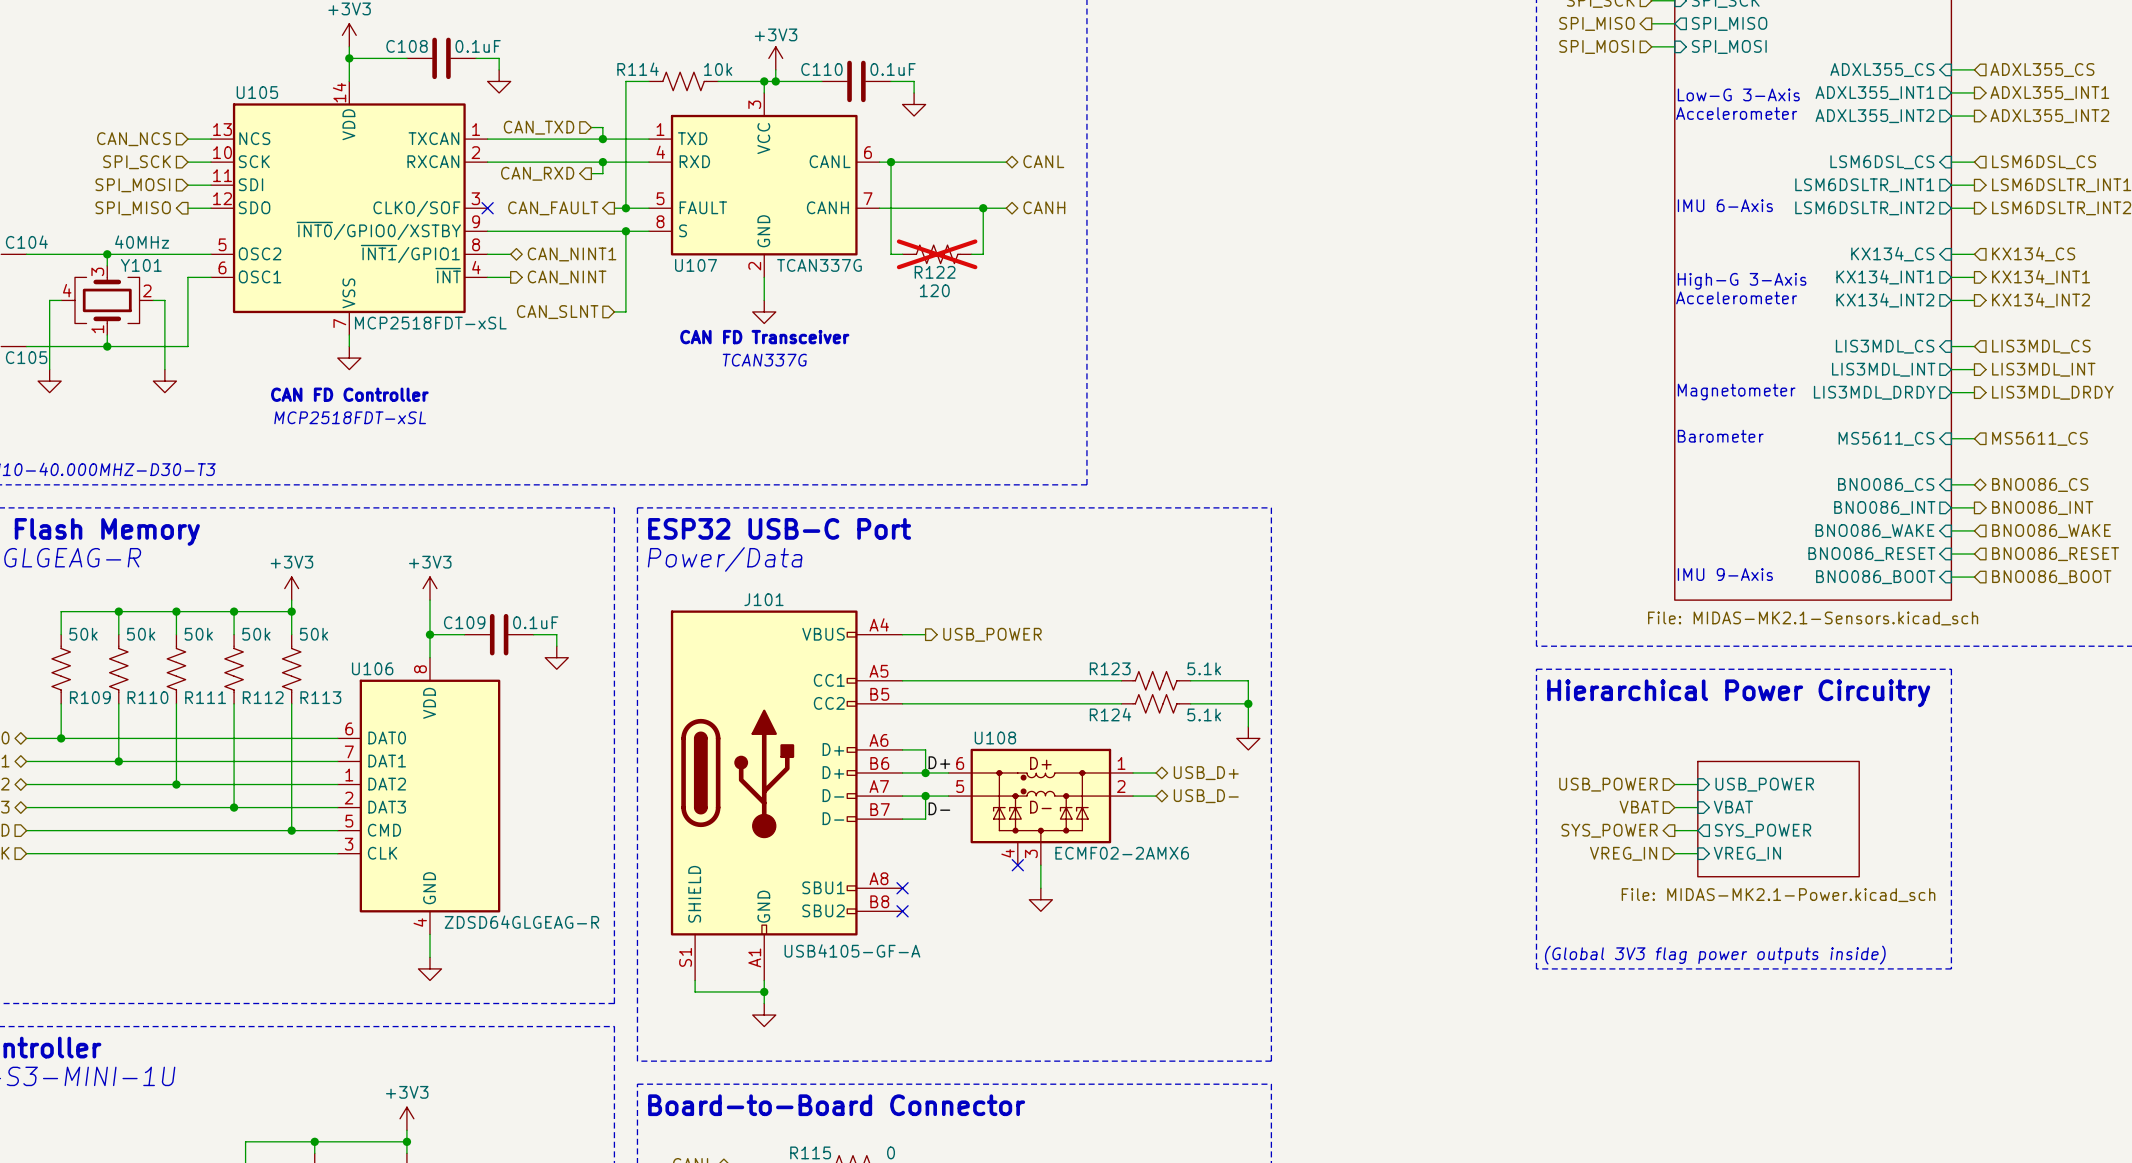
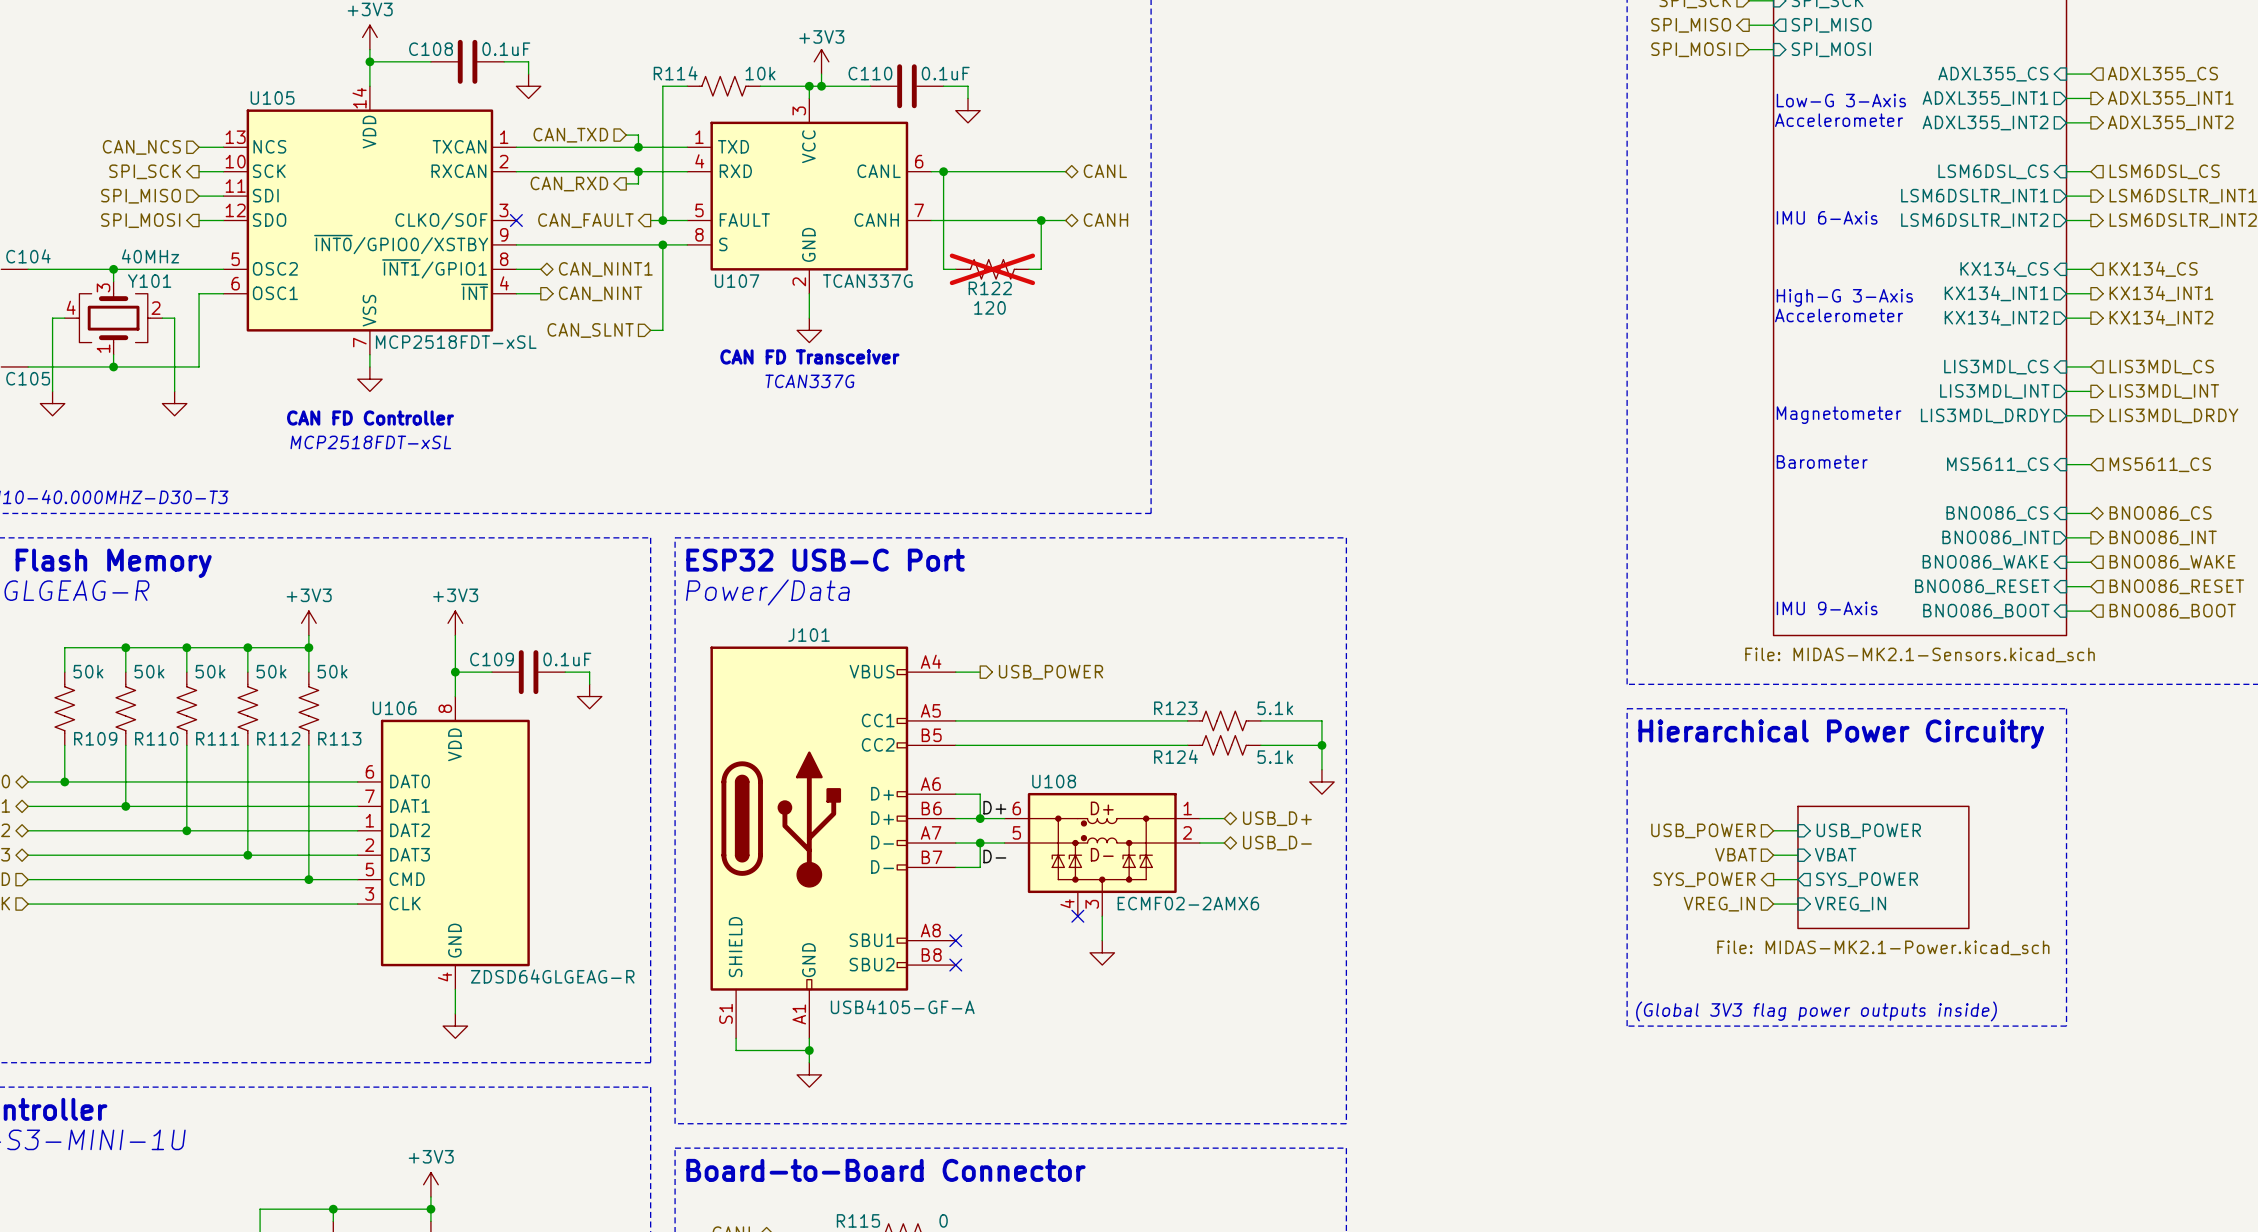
hierarchical label shape: input (137, 162) -> output (145, 171)
hierarchical label: SPI_MOSI (132, 185) -> SPI_MISO (141, 196)
hierarchical label: SPI_MISO (133, 208) -> SPI_MOSI (140, 220)

